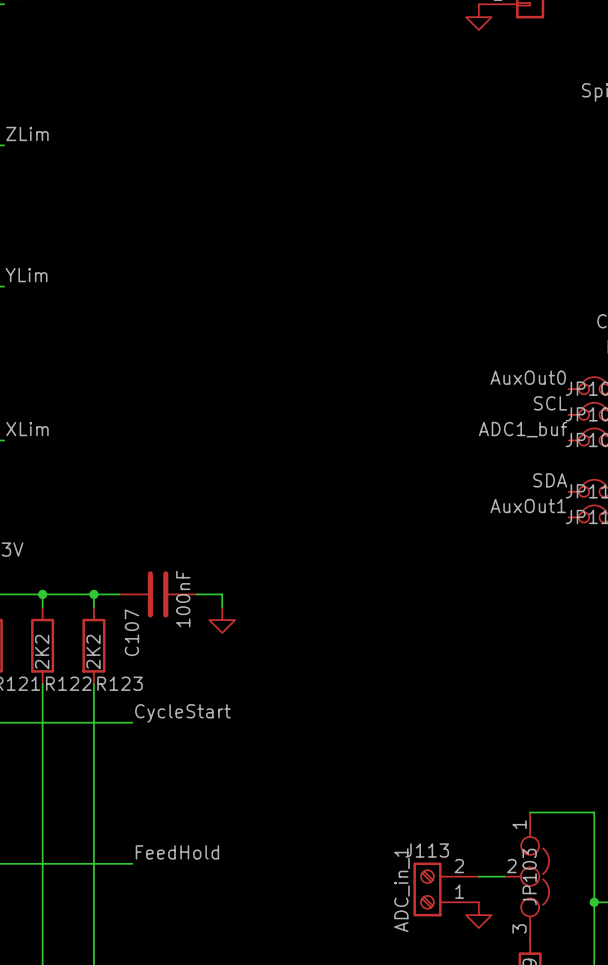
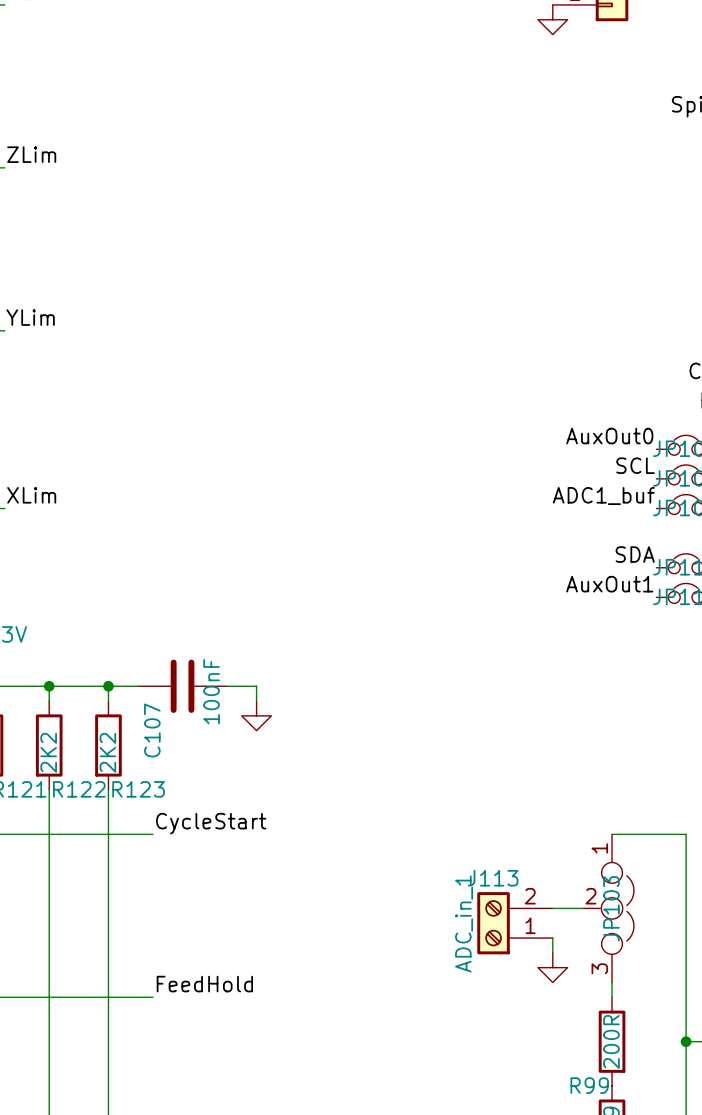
wire: none -> (552, 938) (552, 952)
wire: (530, 812) (594, 812) -> (612, 834) (686, 834) (686, 938)
wire: none -> (612, 982) (612, 997)
wire: (478, 876) (504, 876) -> (552, 908) (582, 908)
JP103 position: (526, 876) -> (608, 908)
J113 position: (446, 889) -> (515, 923)
R99: none -> 200R (612, 1041)
power symbol position: (478, 915) -> (552, 967)

